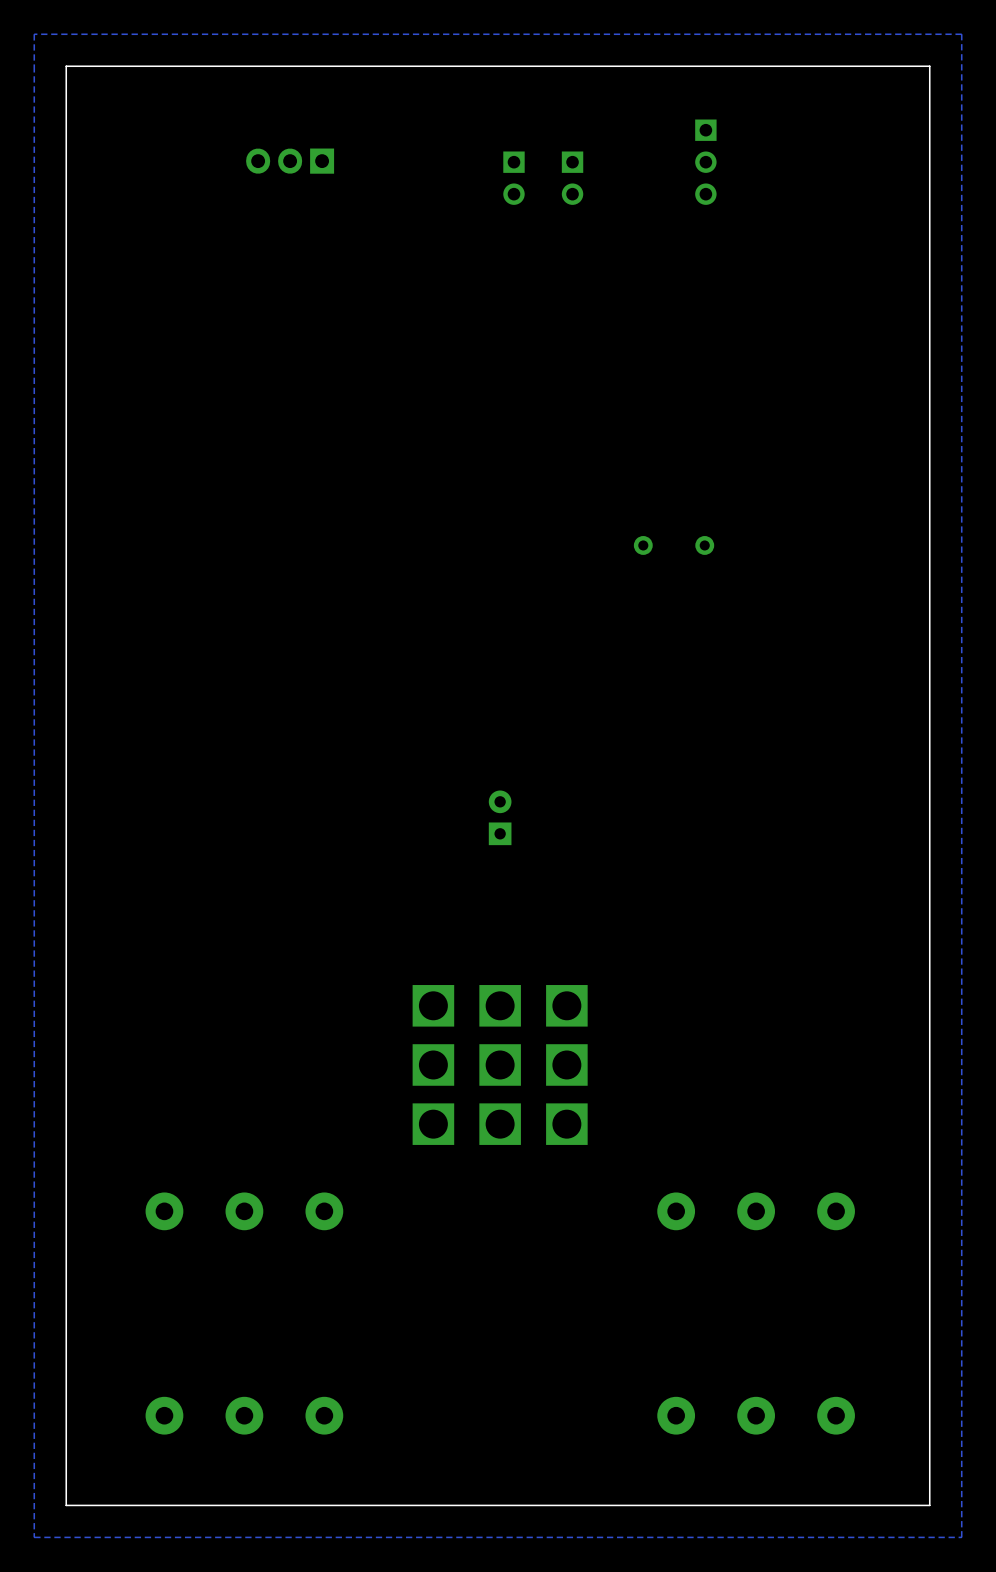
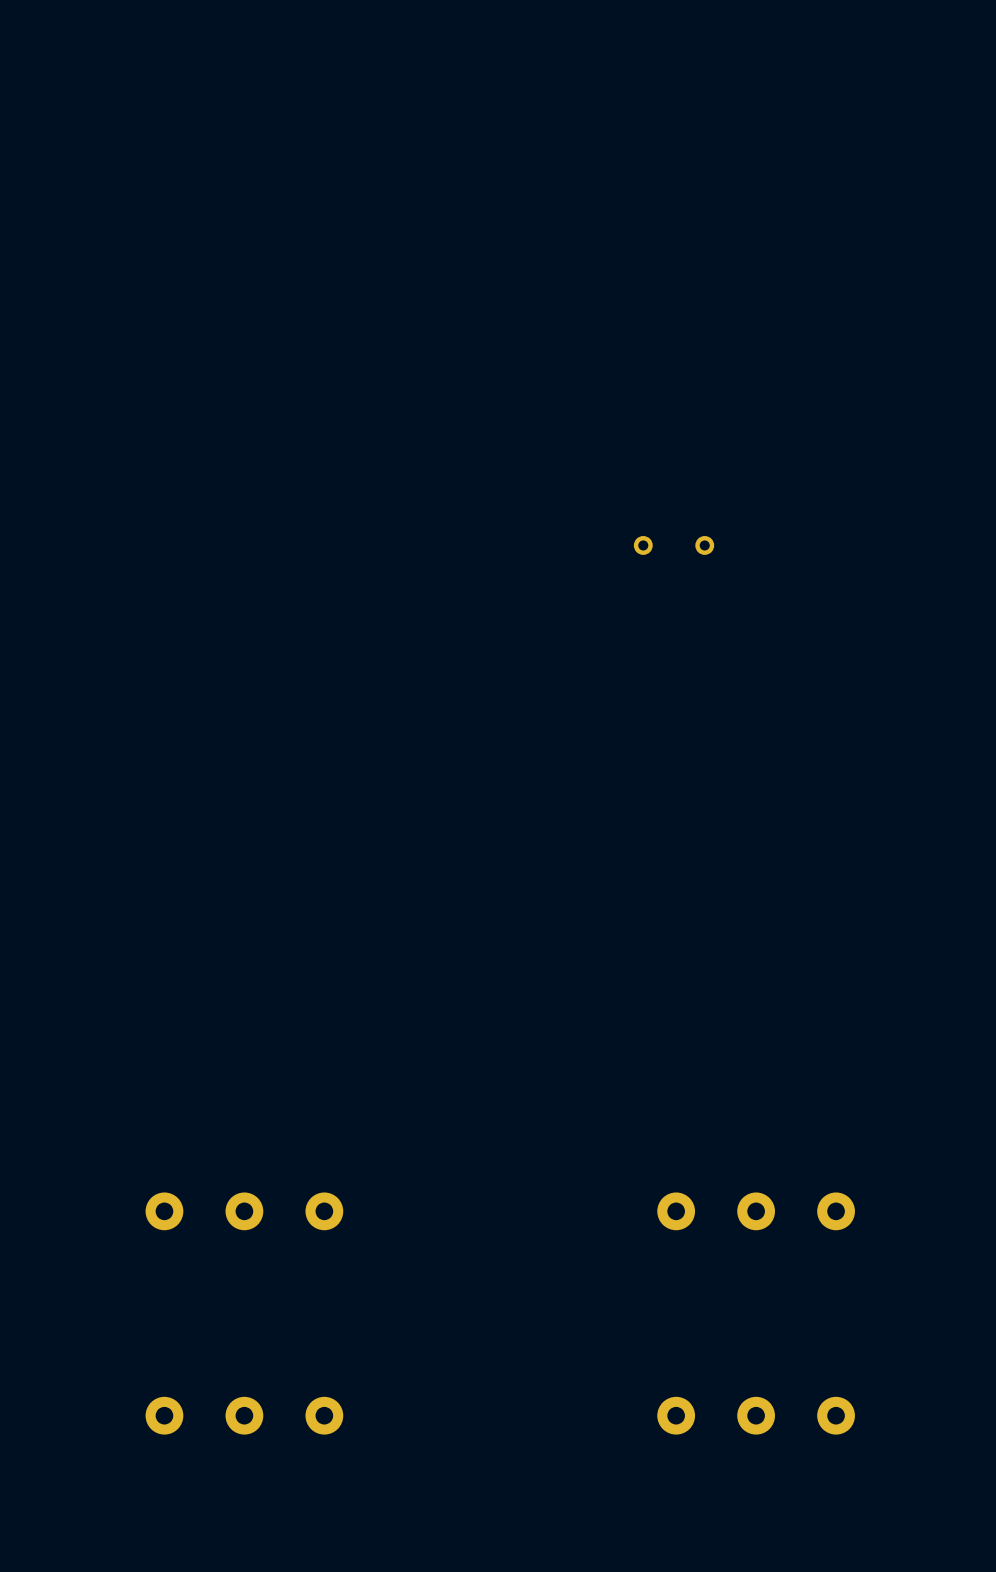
zone outline: (961, 34) (961, 1537) (34, 1537) (34, 34) (961, 34) -> none
board edge: (929, 66) (66, 66) (66, 1505) (929, 1505) (929, 66) -> none
part: (290, 161) -> none
part: (705, 162) -> none
part: (513, 178) -> none
part: (572, 178) -> none
part: (500, 817) -> none
part: (500, 1064) -> none

